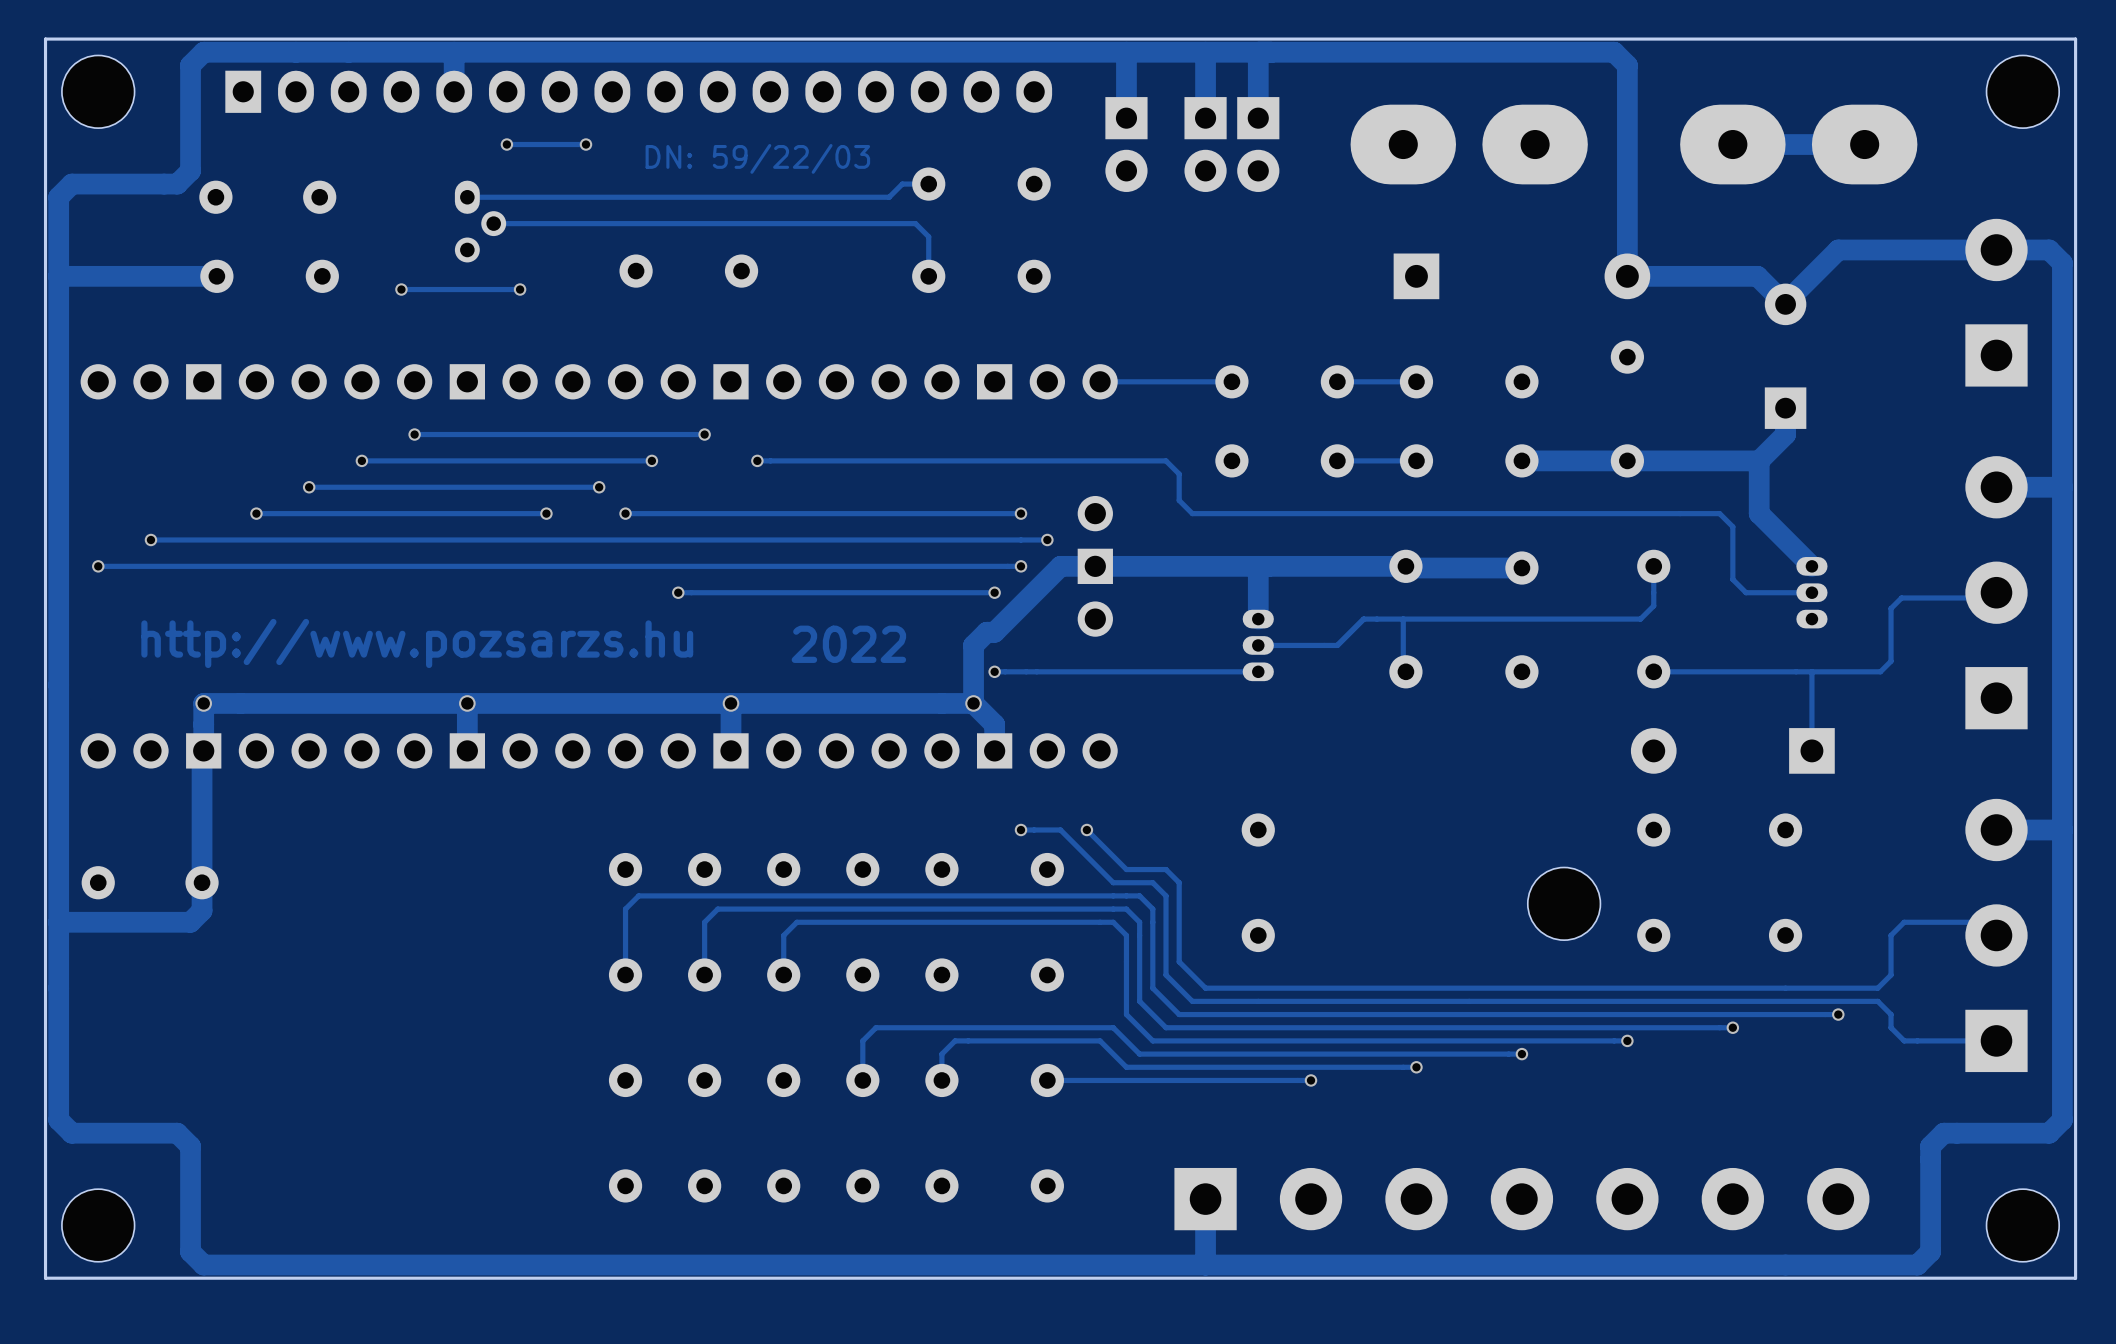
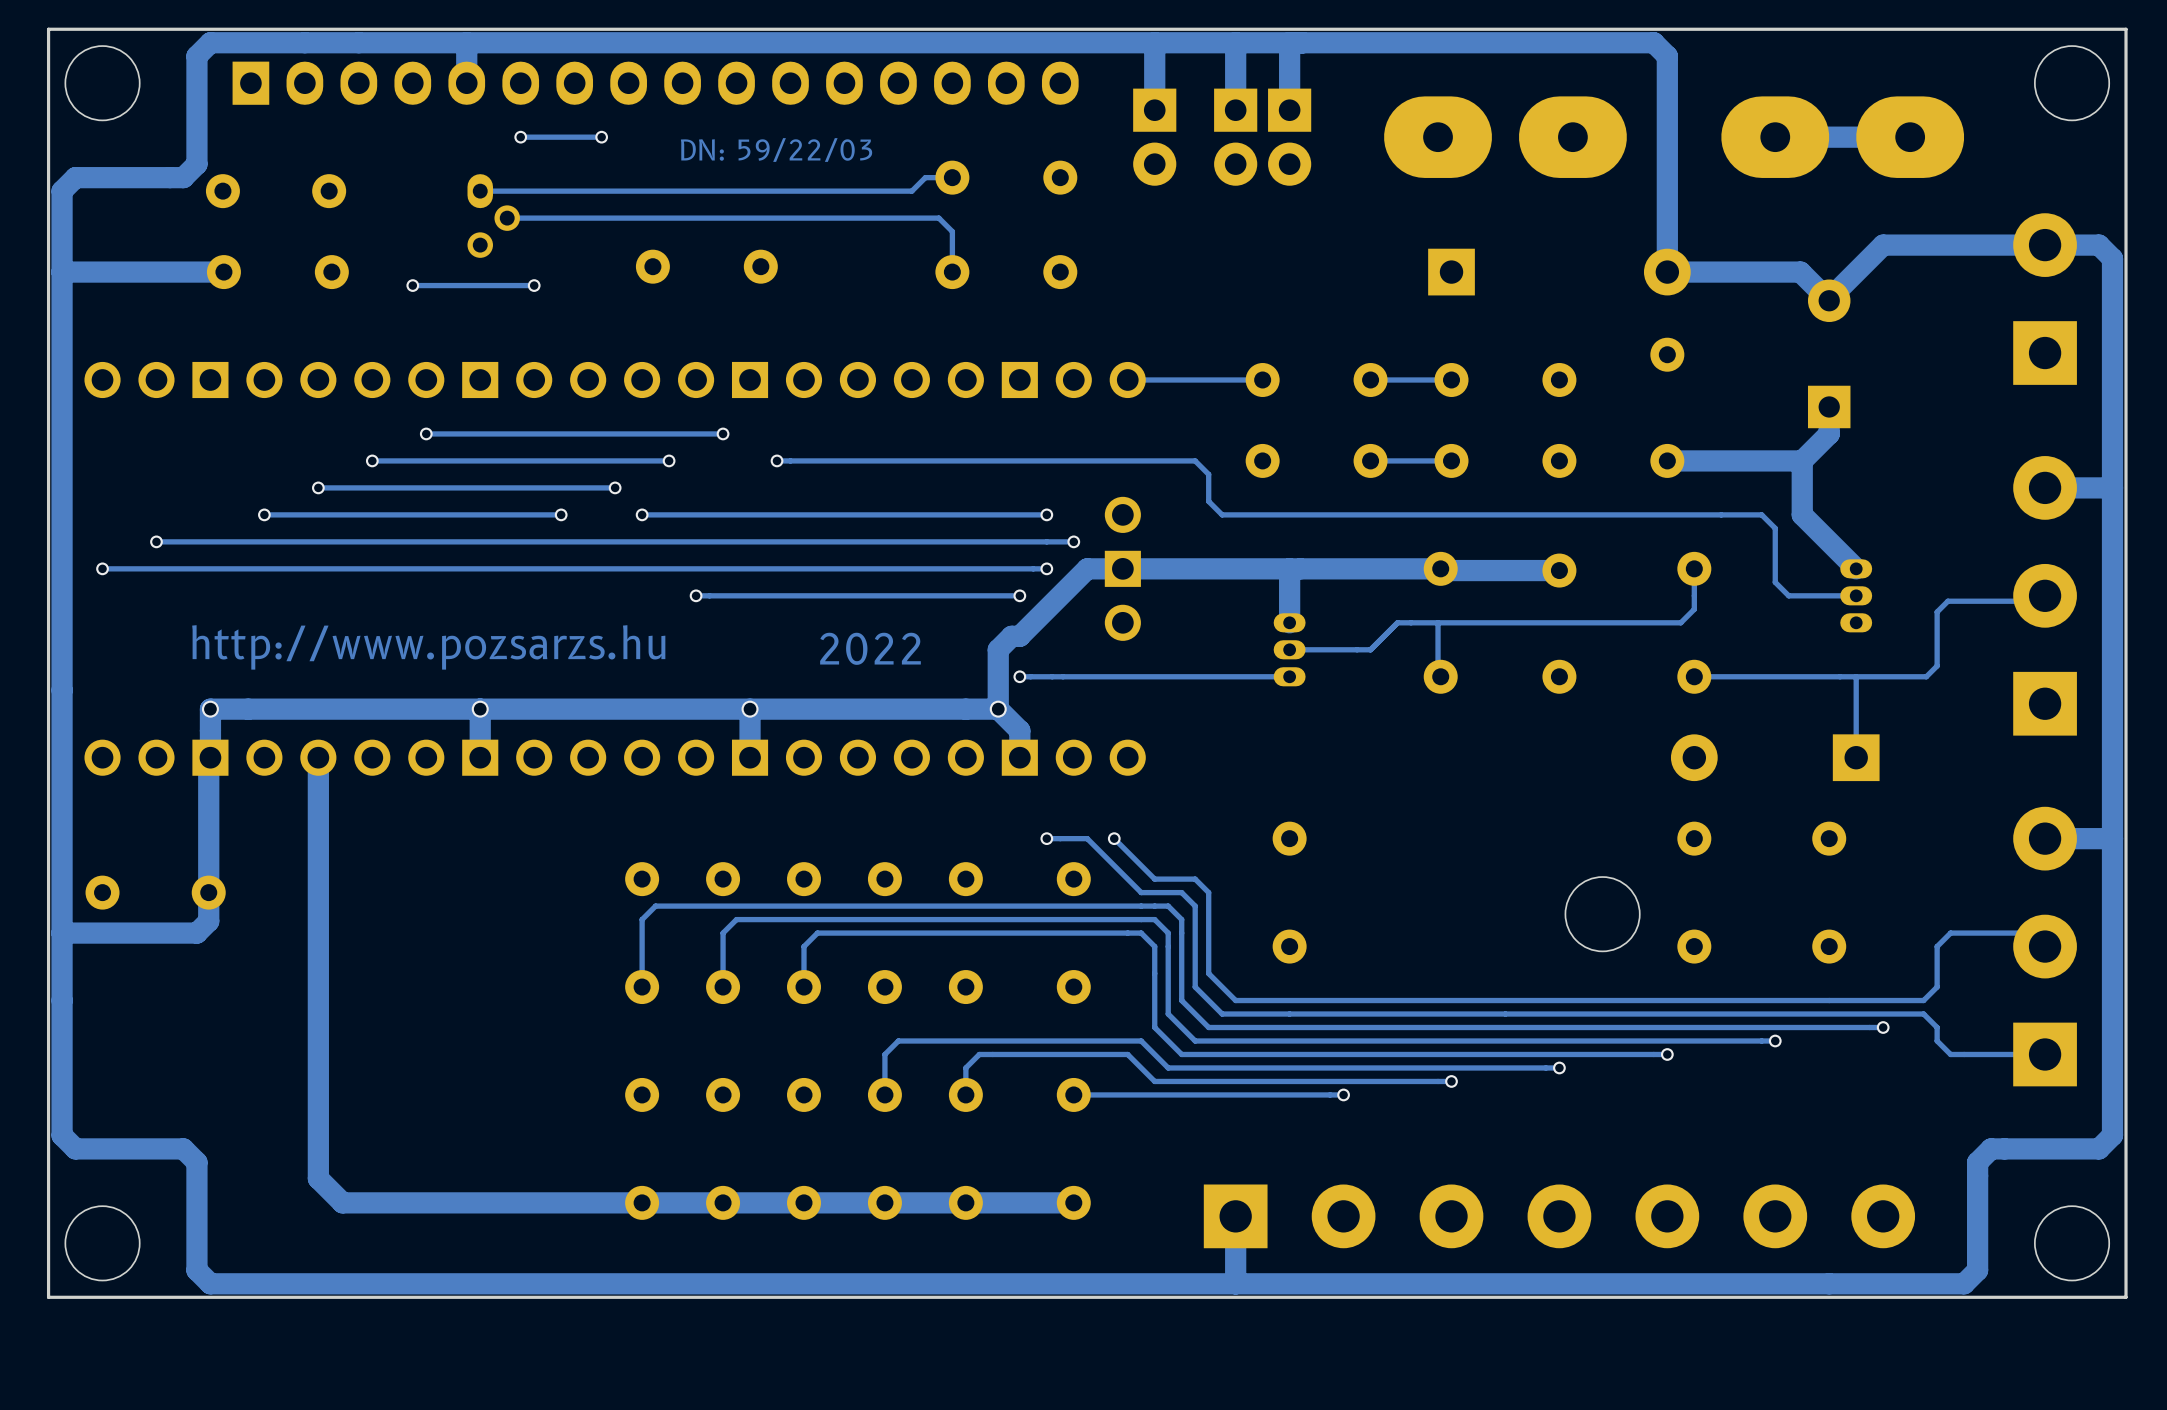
track: (1627, 460) (1521, 460) -> none
track: none -> (318, 757) (318, 1178) (342, 1202) (1073, 1202)

